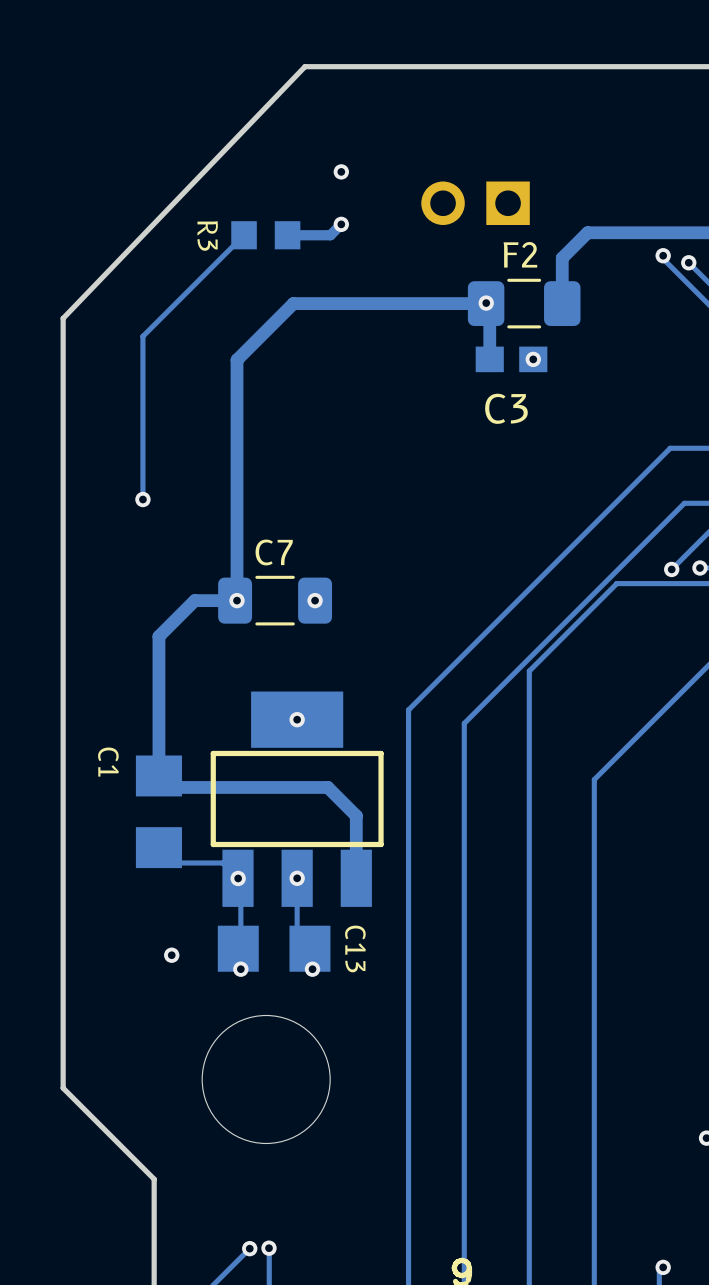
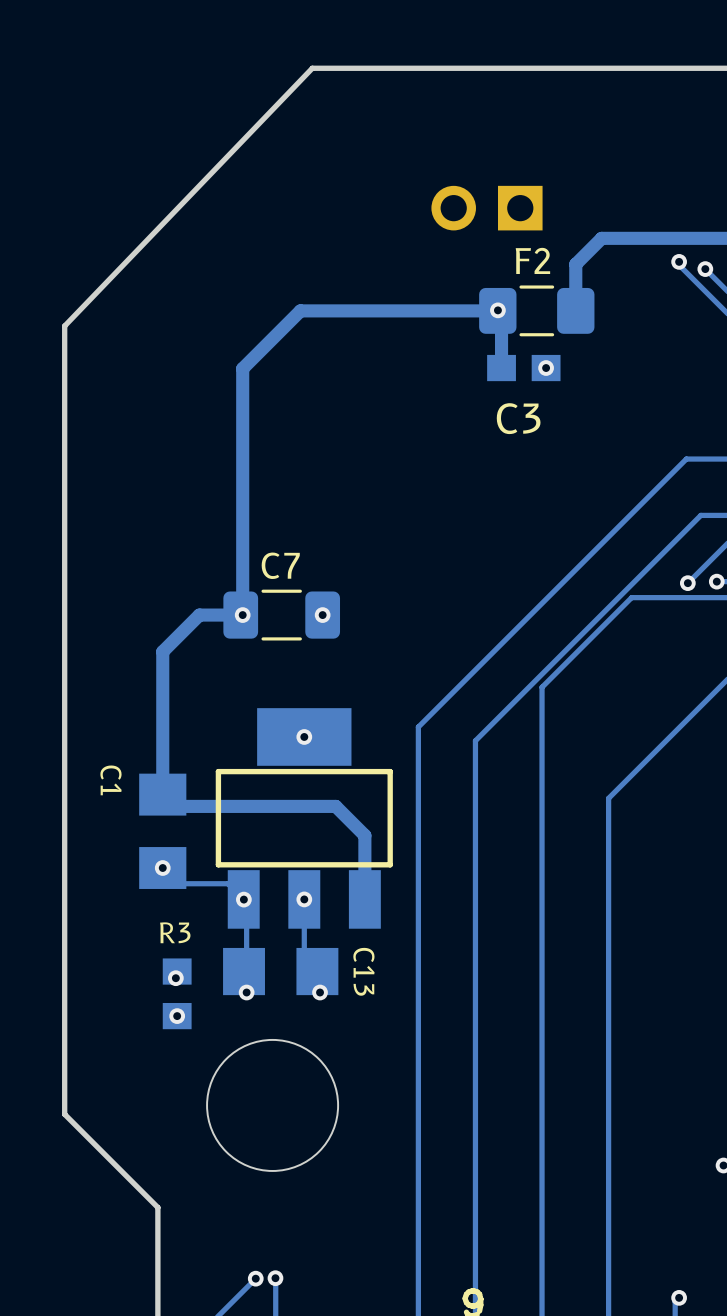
via: (341, 171) -> none
track: (341, 224) (330, 235) (287, 235) -> none
via: (341, 224) -> none
track: (244, 235) (142, 336) (142, 499) -> none
R3 rotation: 0° (265, 235) -> 90° clockwise (177, 993)
R3 position: (265, 235) -> (177, 993)
via: (142, 499) -> none
via: none -> (162, 868)
via: none -> (177, 1016)

